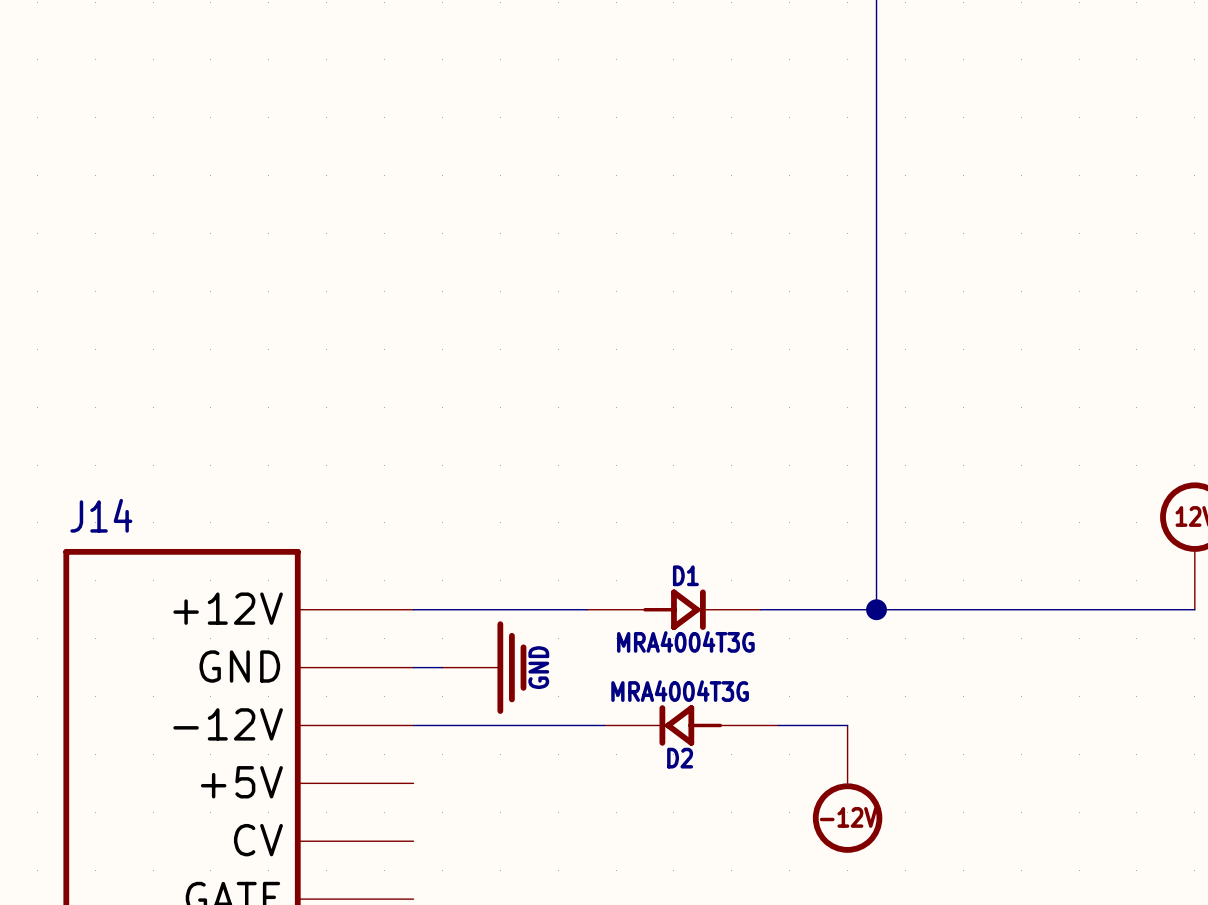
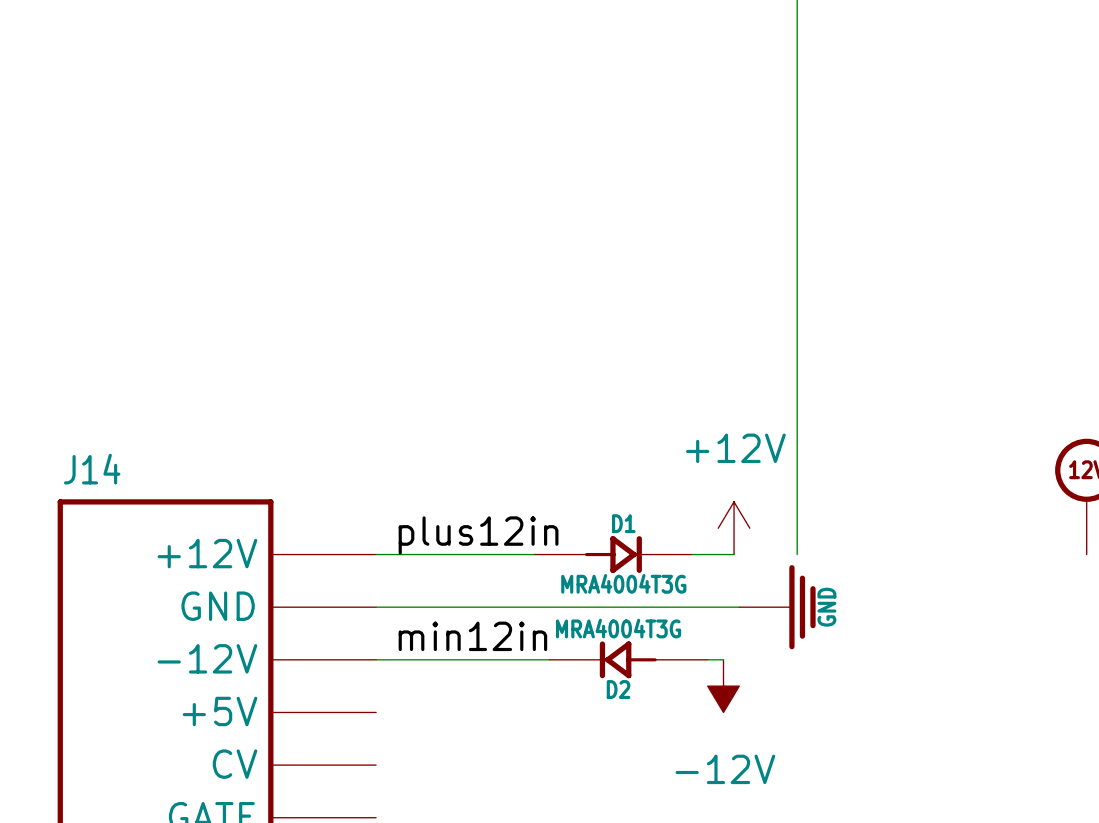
power symbol: none -> +12V (734, 528)
label: none -> plus12in (478, 535)
wire: (807, 609) (1194, 609) -> none
junction: (876, 609) -> none
wire: none -> (402, 607) (739, 607)
power symbol position: GND (484, 667) -> GND (777, 607)
label: none -> min12in (472, 636)
wire: (795, 725) (847, 725) -> none
power symbol: none -> -12V (723, 686)
power symbol: (847, 789) -> none

